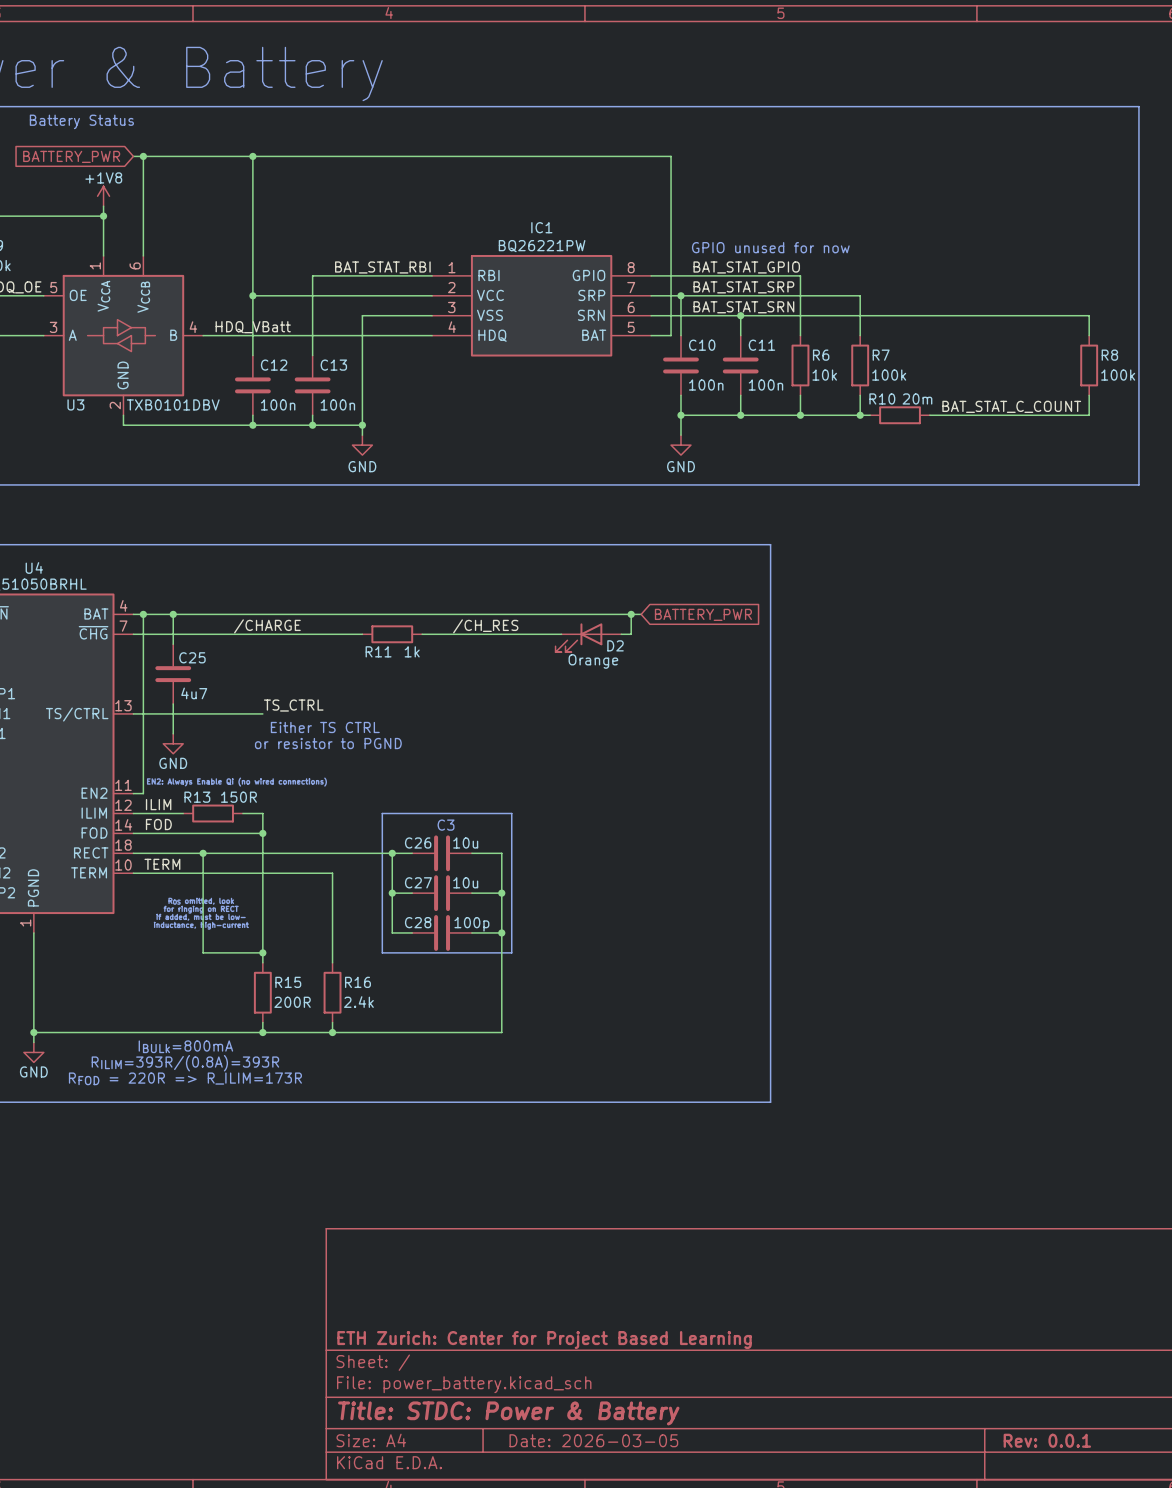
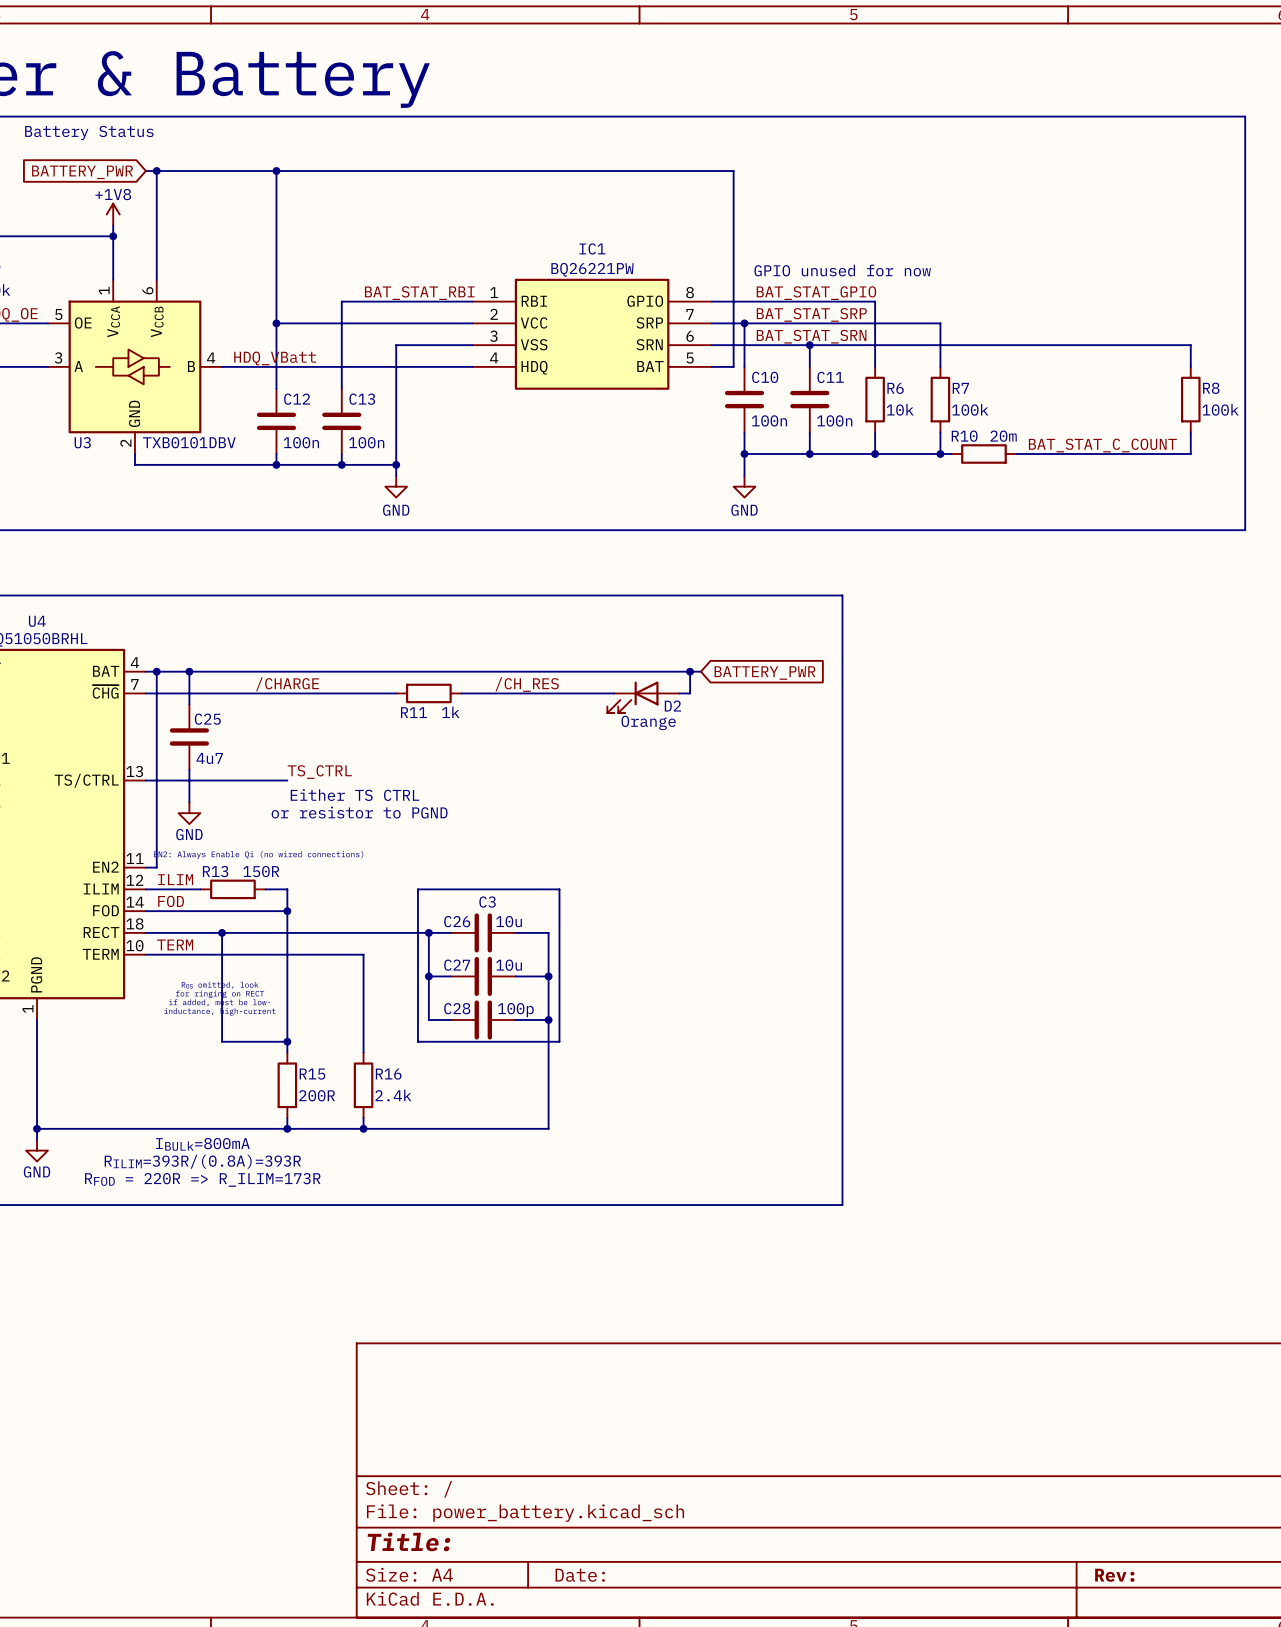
title block: ETH Zurich: Center for Project Based Learning (544, 1340) -> none
title block: Title: STDC: Power & Battery (508, 1413) -> Title: (408, 1541)
title block: Date: 2026-03-05 (593, 1440) -> Date: (580, 1575)
title block: Rev: 0.0.1 (1047, 1440) -> Rev: (1114, 1575)

